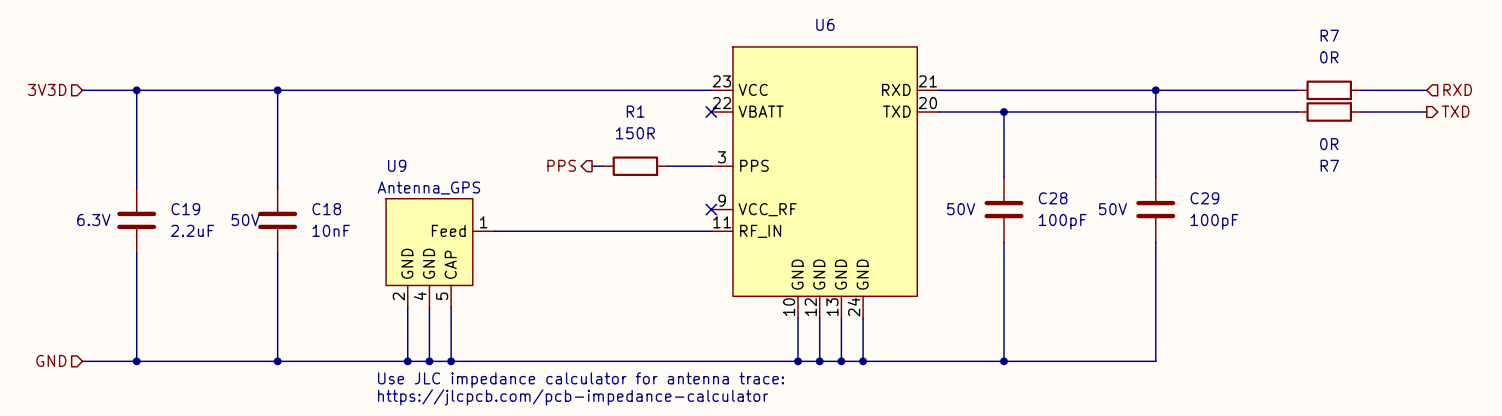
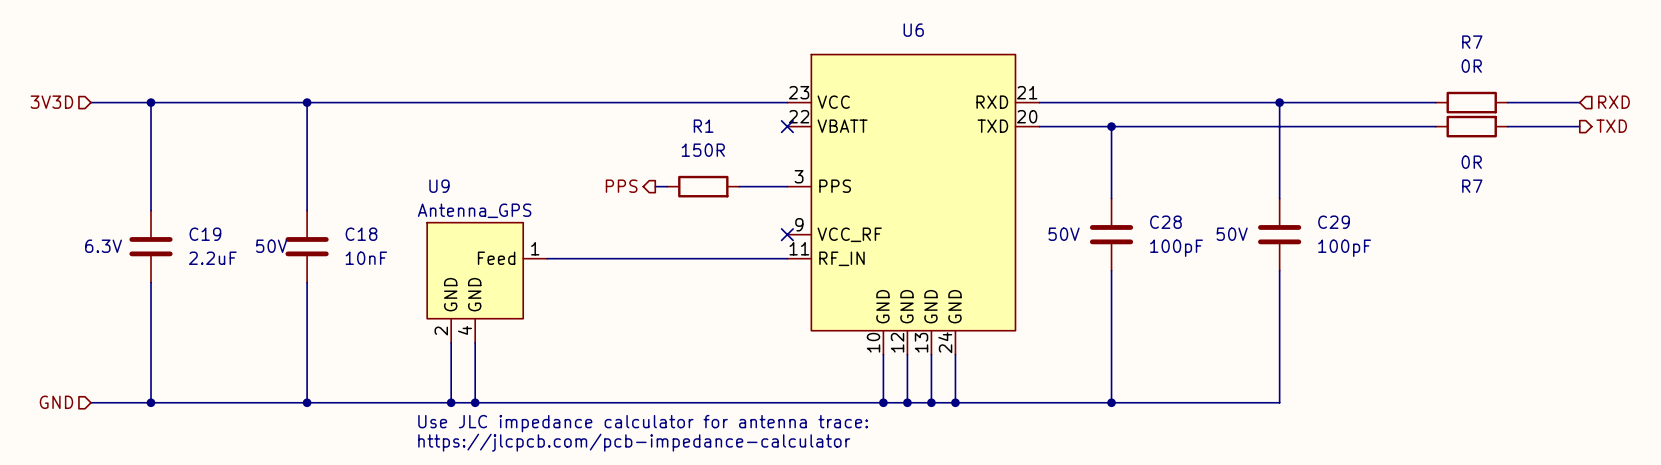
U9 symbol: [386, 198, 495, 308] -> [427, 222, 548, 343]
wire: (451, 307) (451, 361) -> none
junction: (451, 361) -> none

